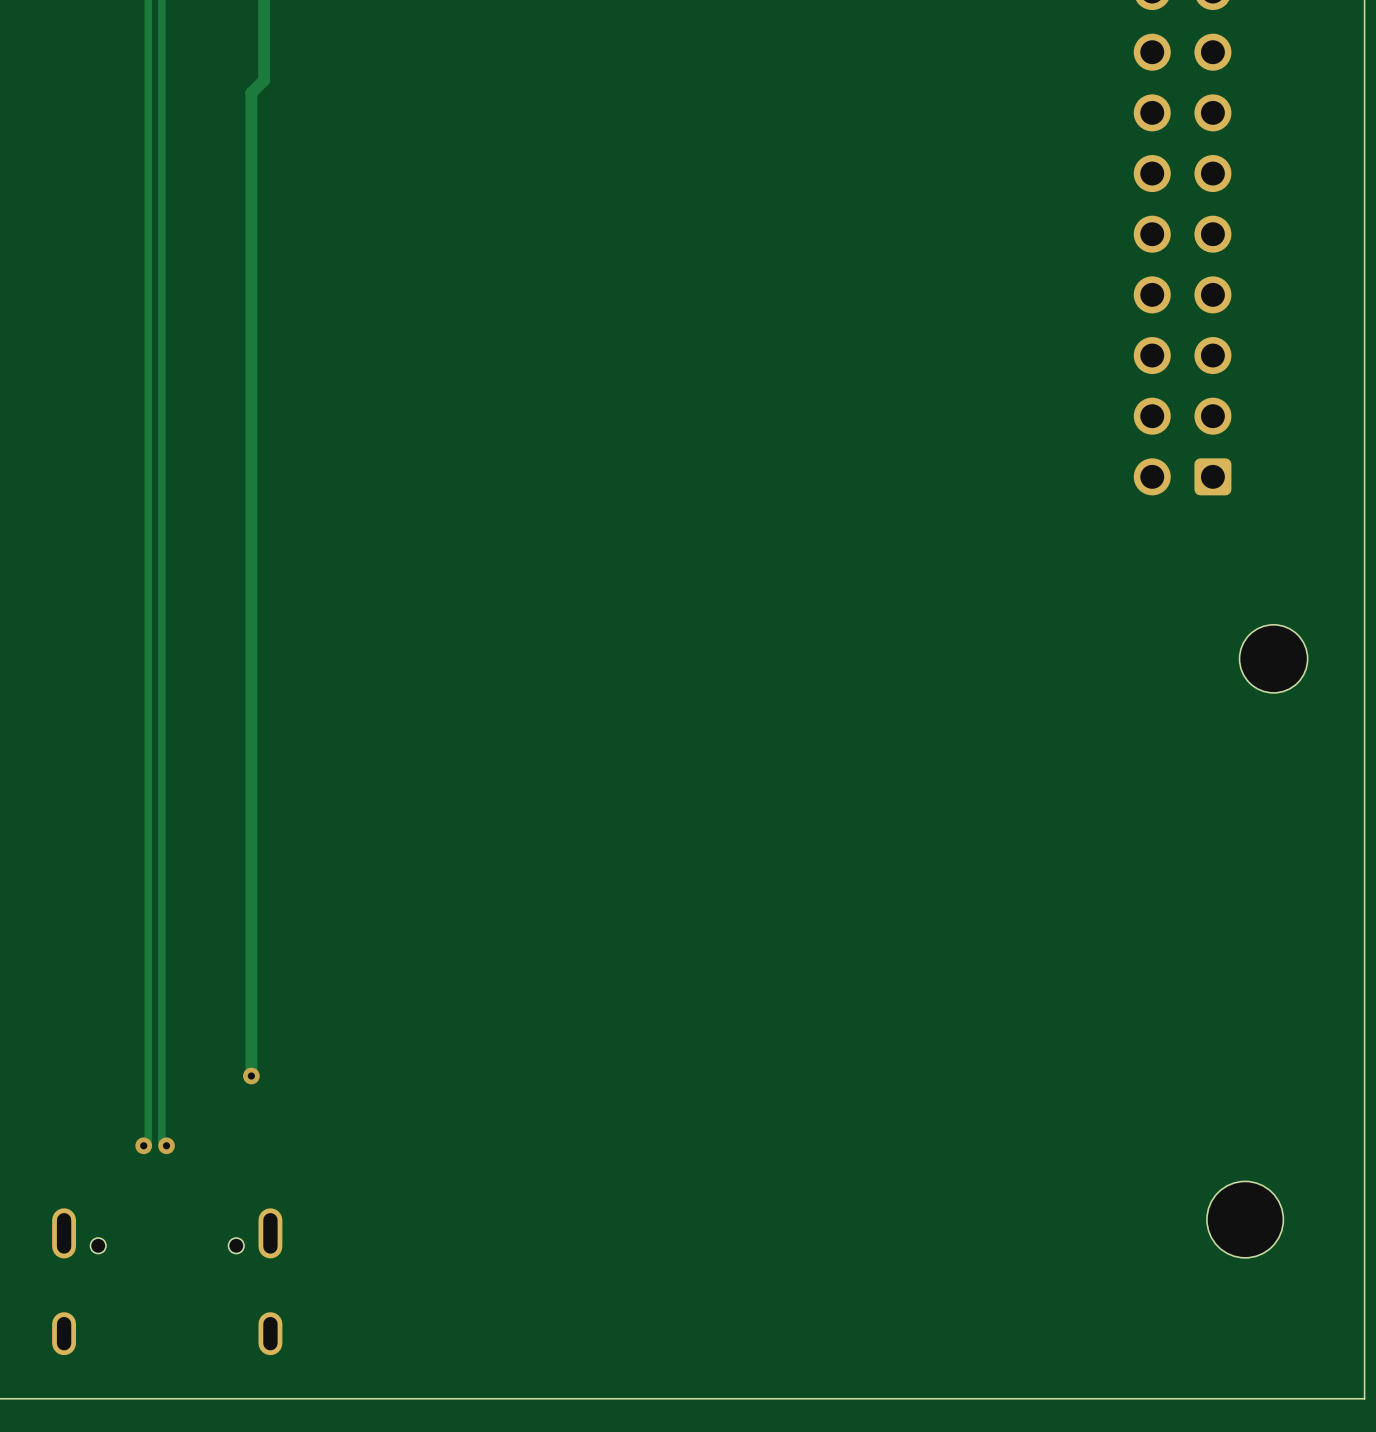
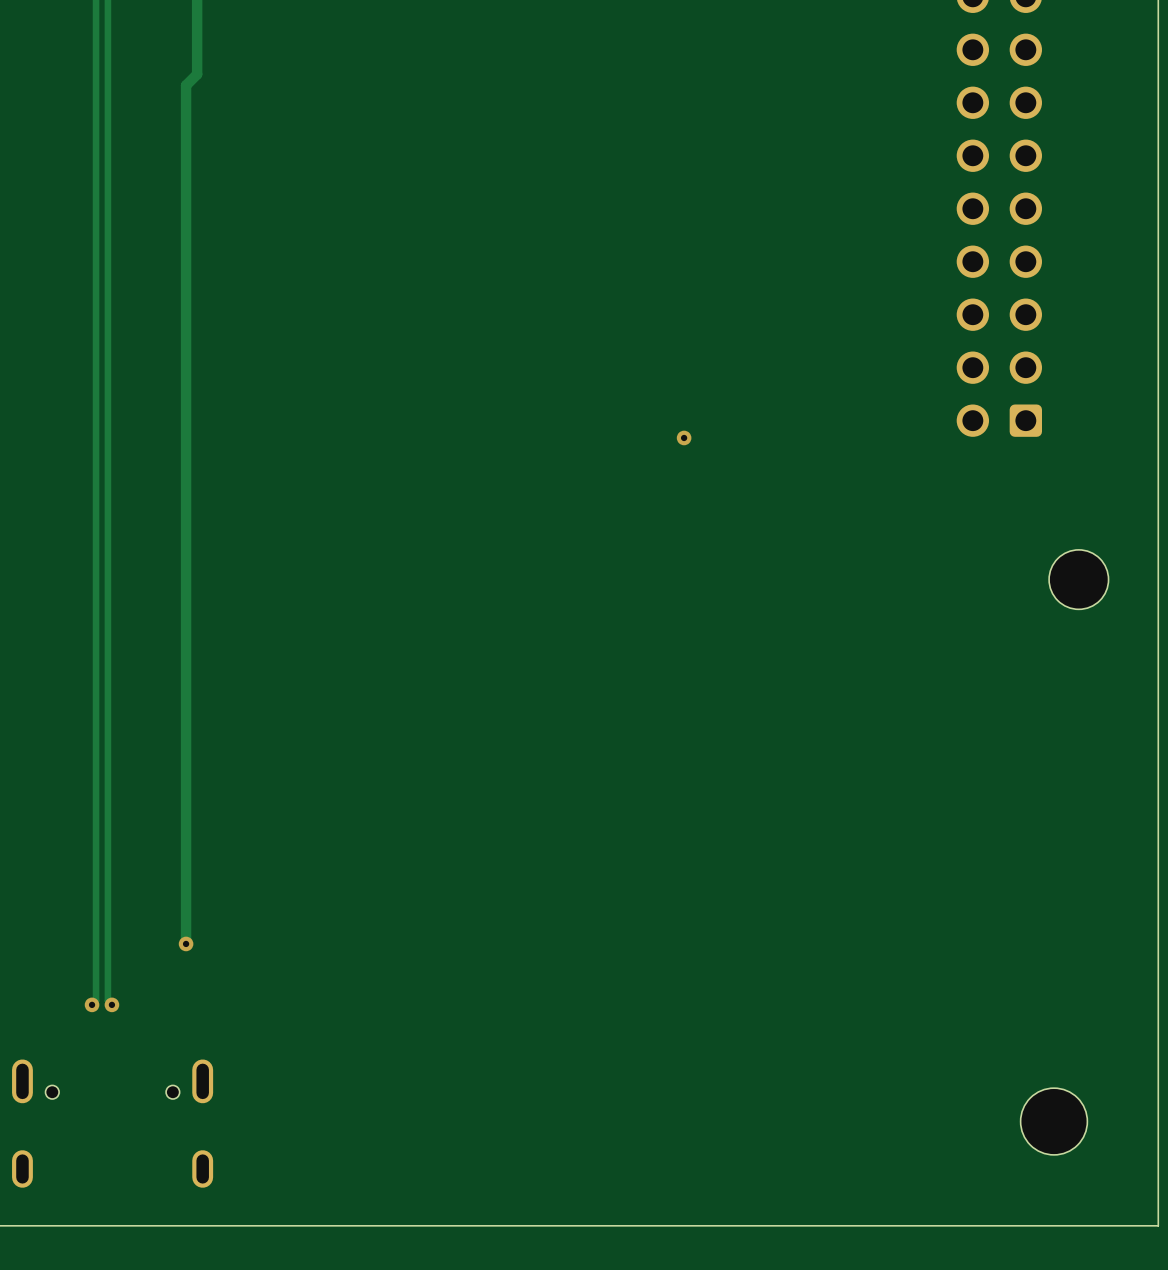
via: none -> (684, 437)
part position: (1245, 1219) -> (1053, 1121)

